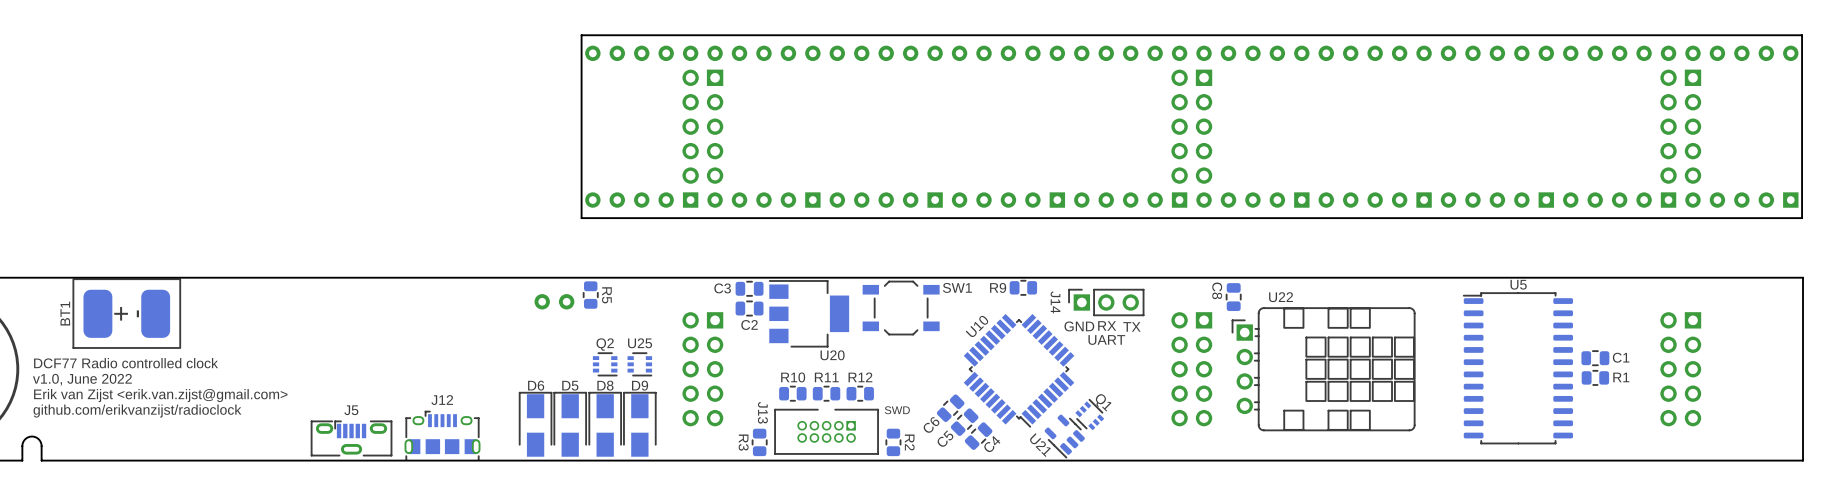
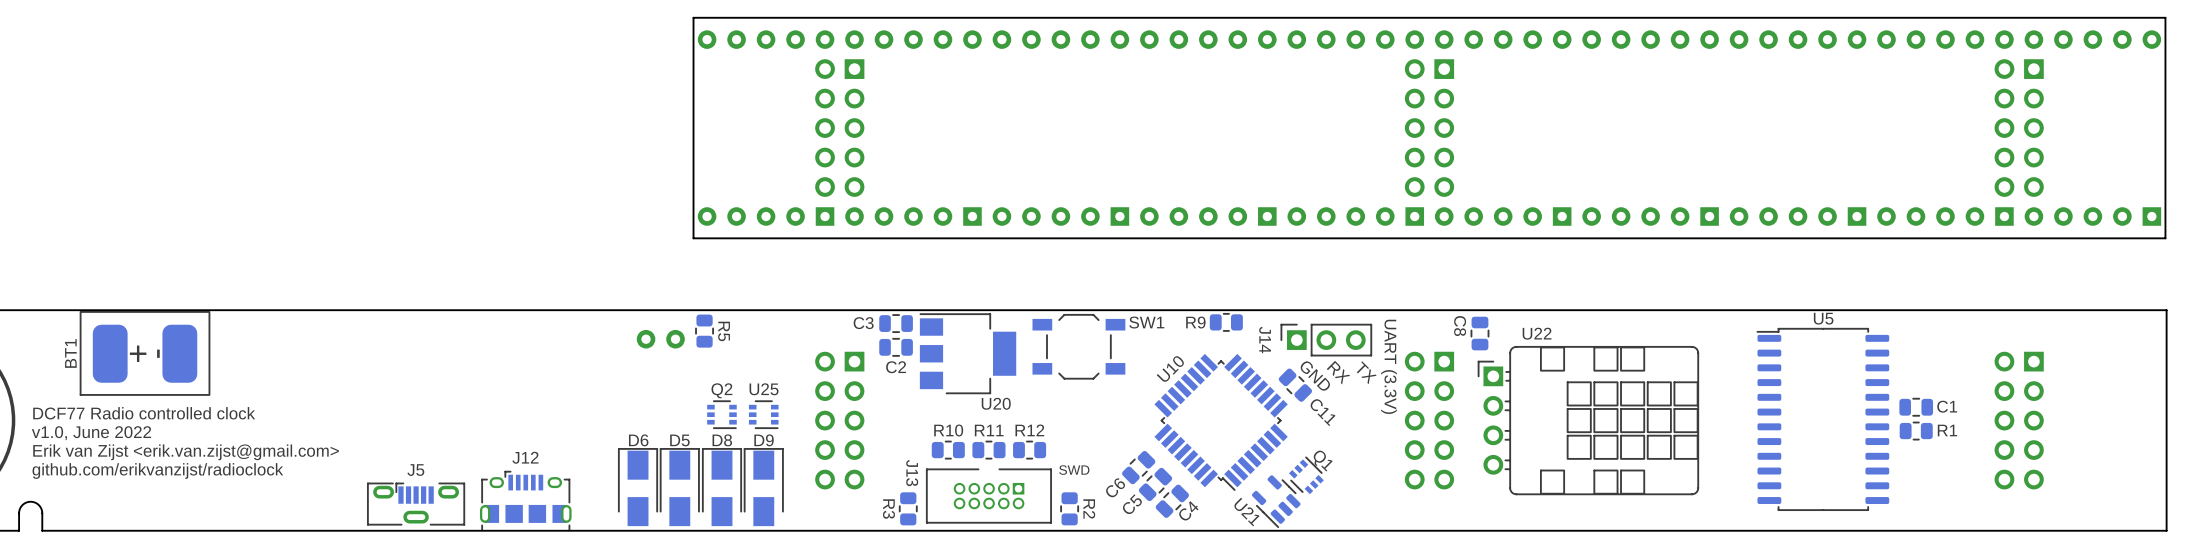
text: none -> UART (3.3V) (1389, 366)
text rotation: 0° (1107, 325) -> 45° clockwise (1338, 372)
text rotation: 0° (1079, 326) -> 45° clockwise (1315, 376)
text rotation: 0° (1131, 326) -> 45° clockwise (1366, 372)
C11: none -> (1295, 385)
text: UART (1106, 339) -> none

